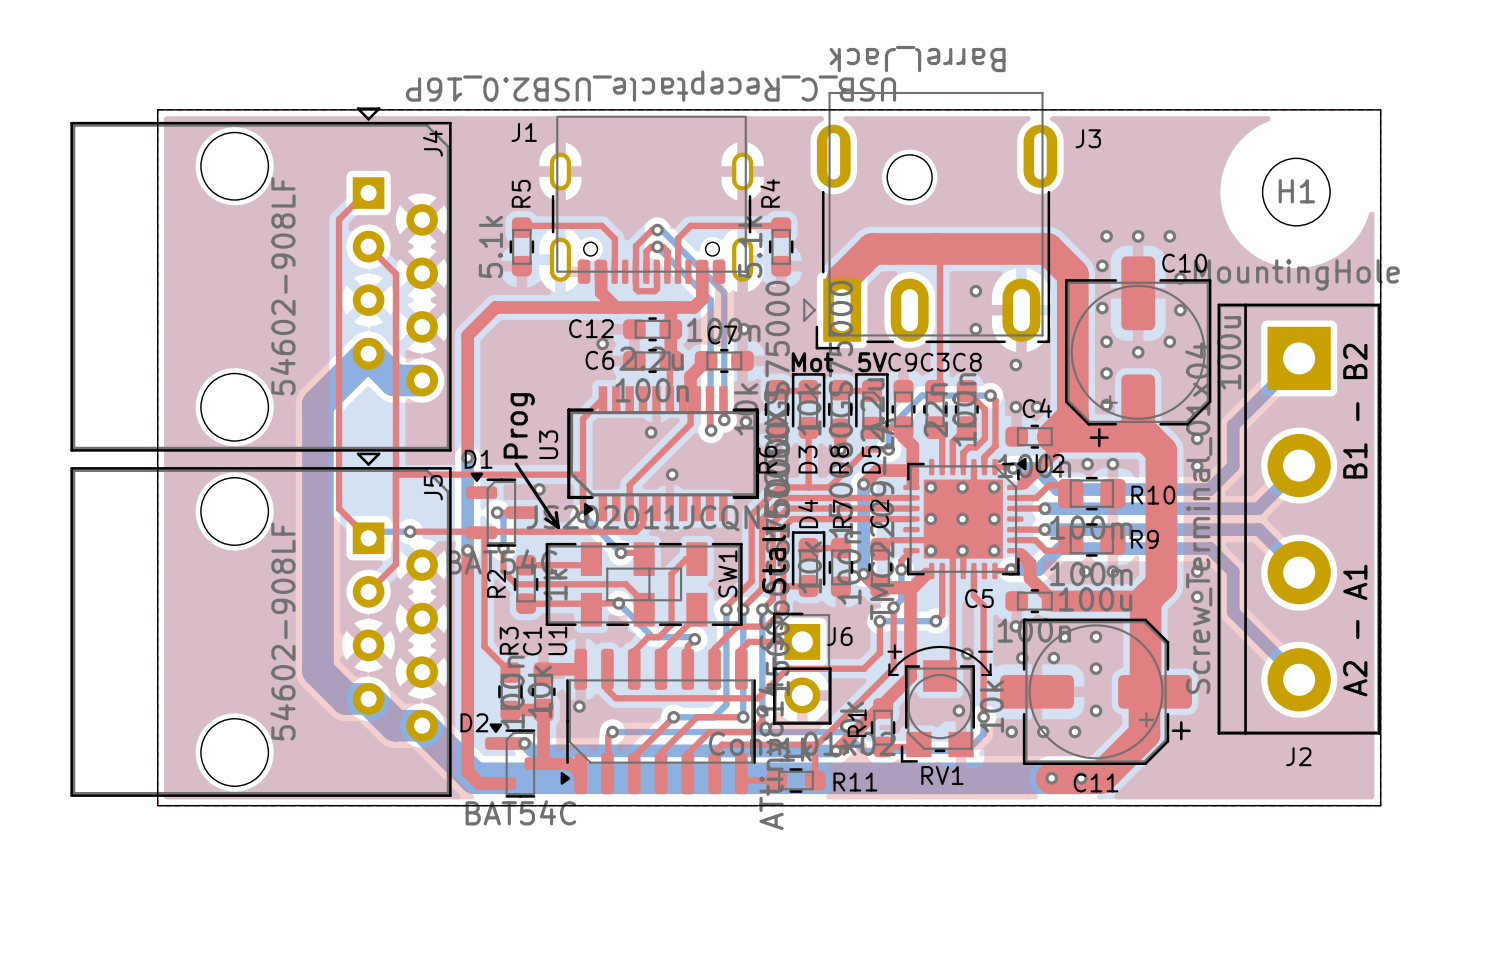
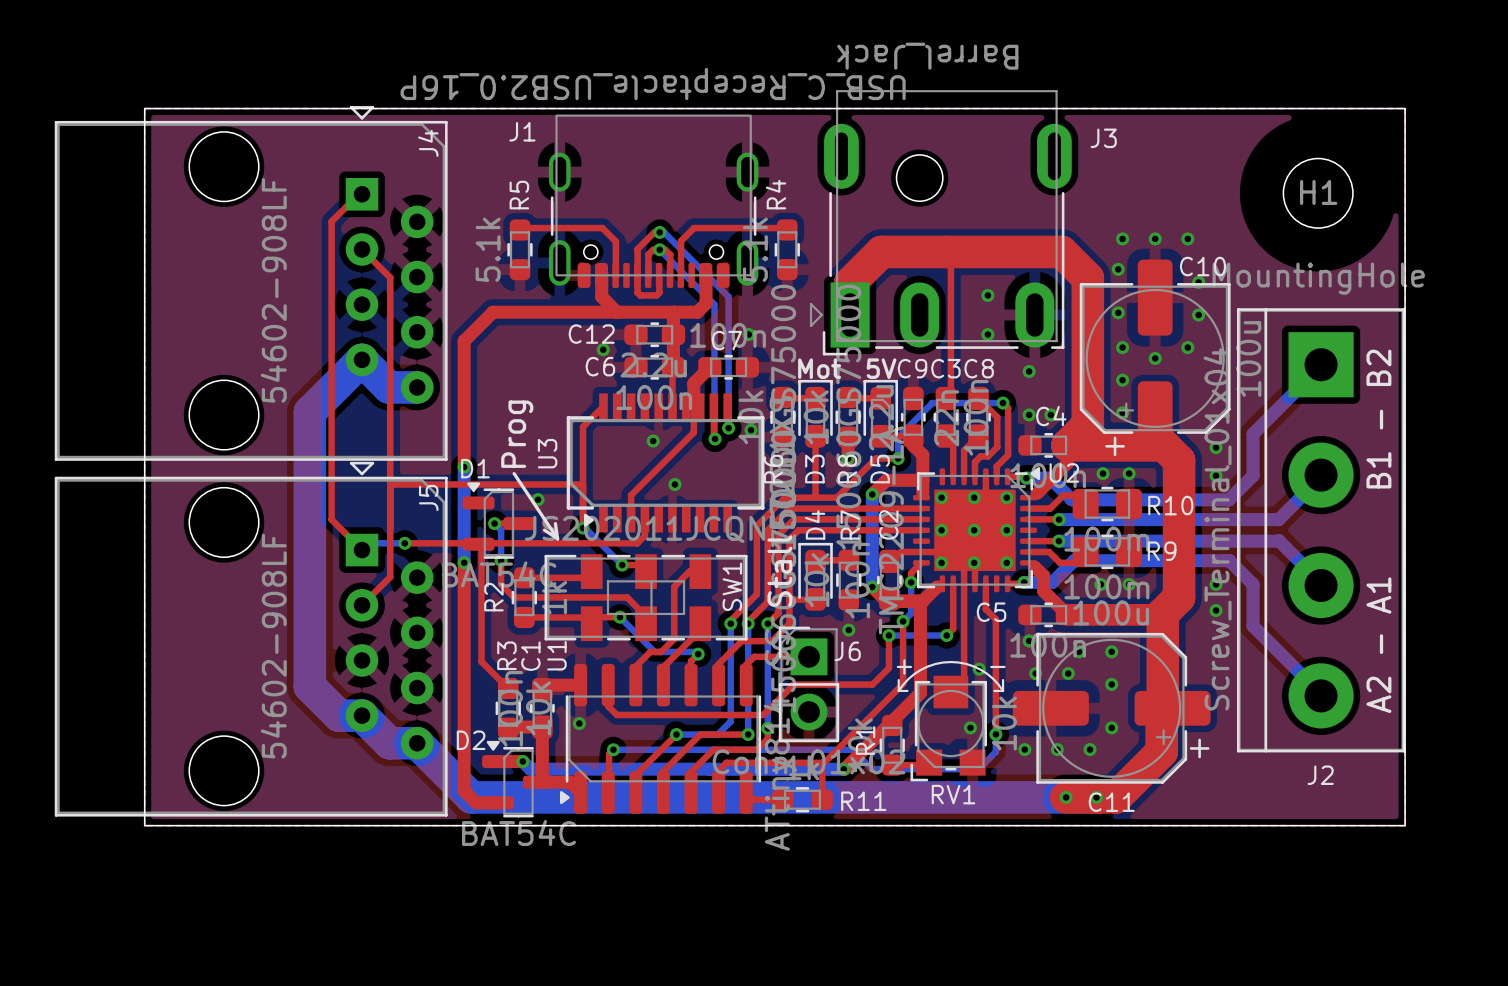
via: none -> (848, 630)

